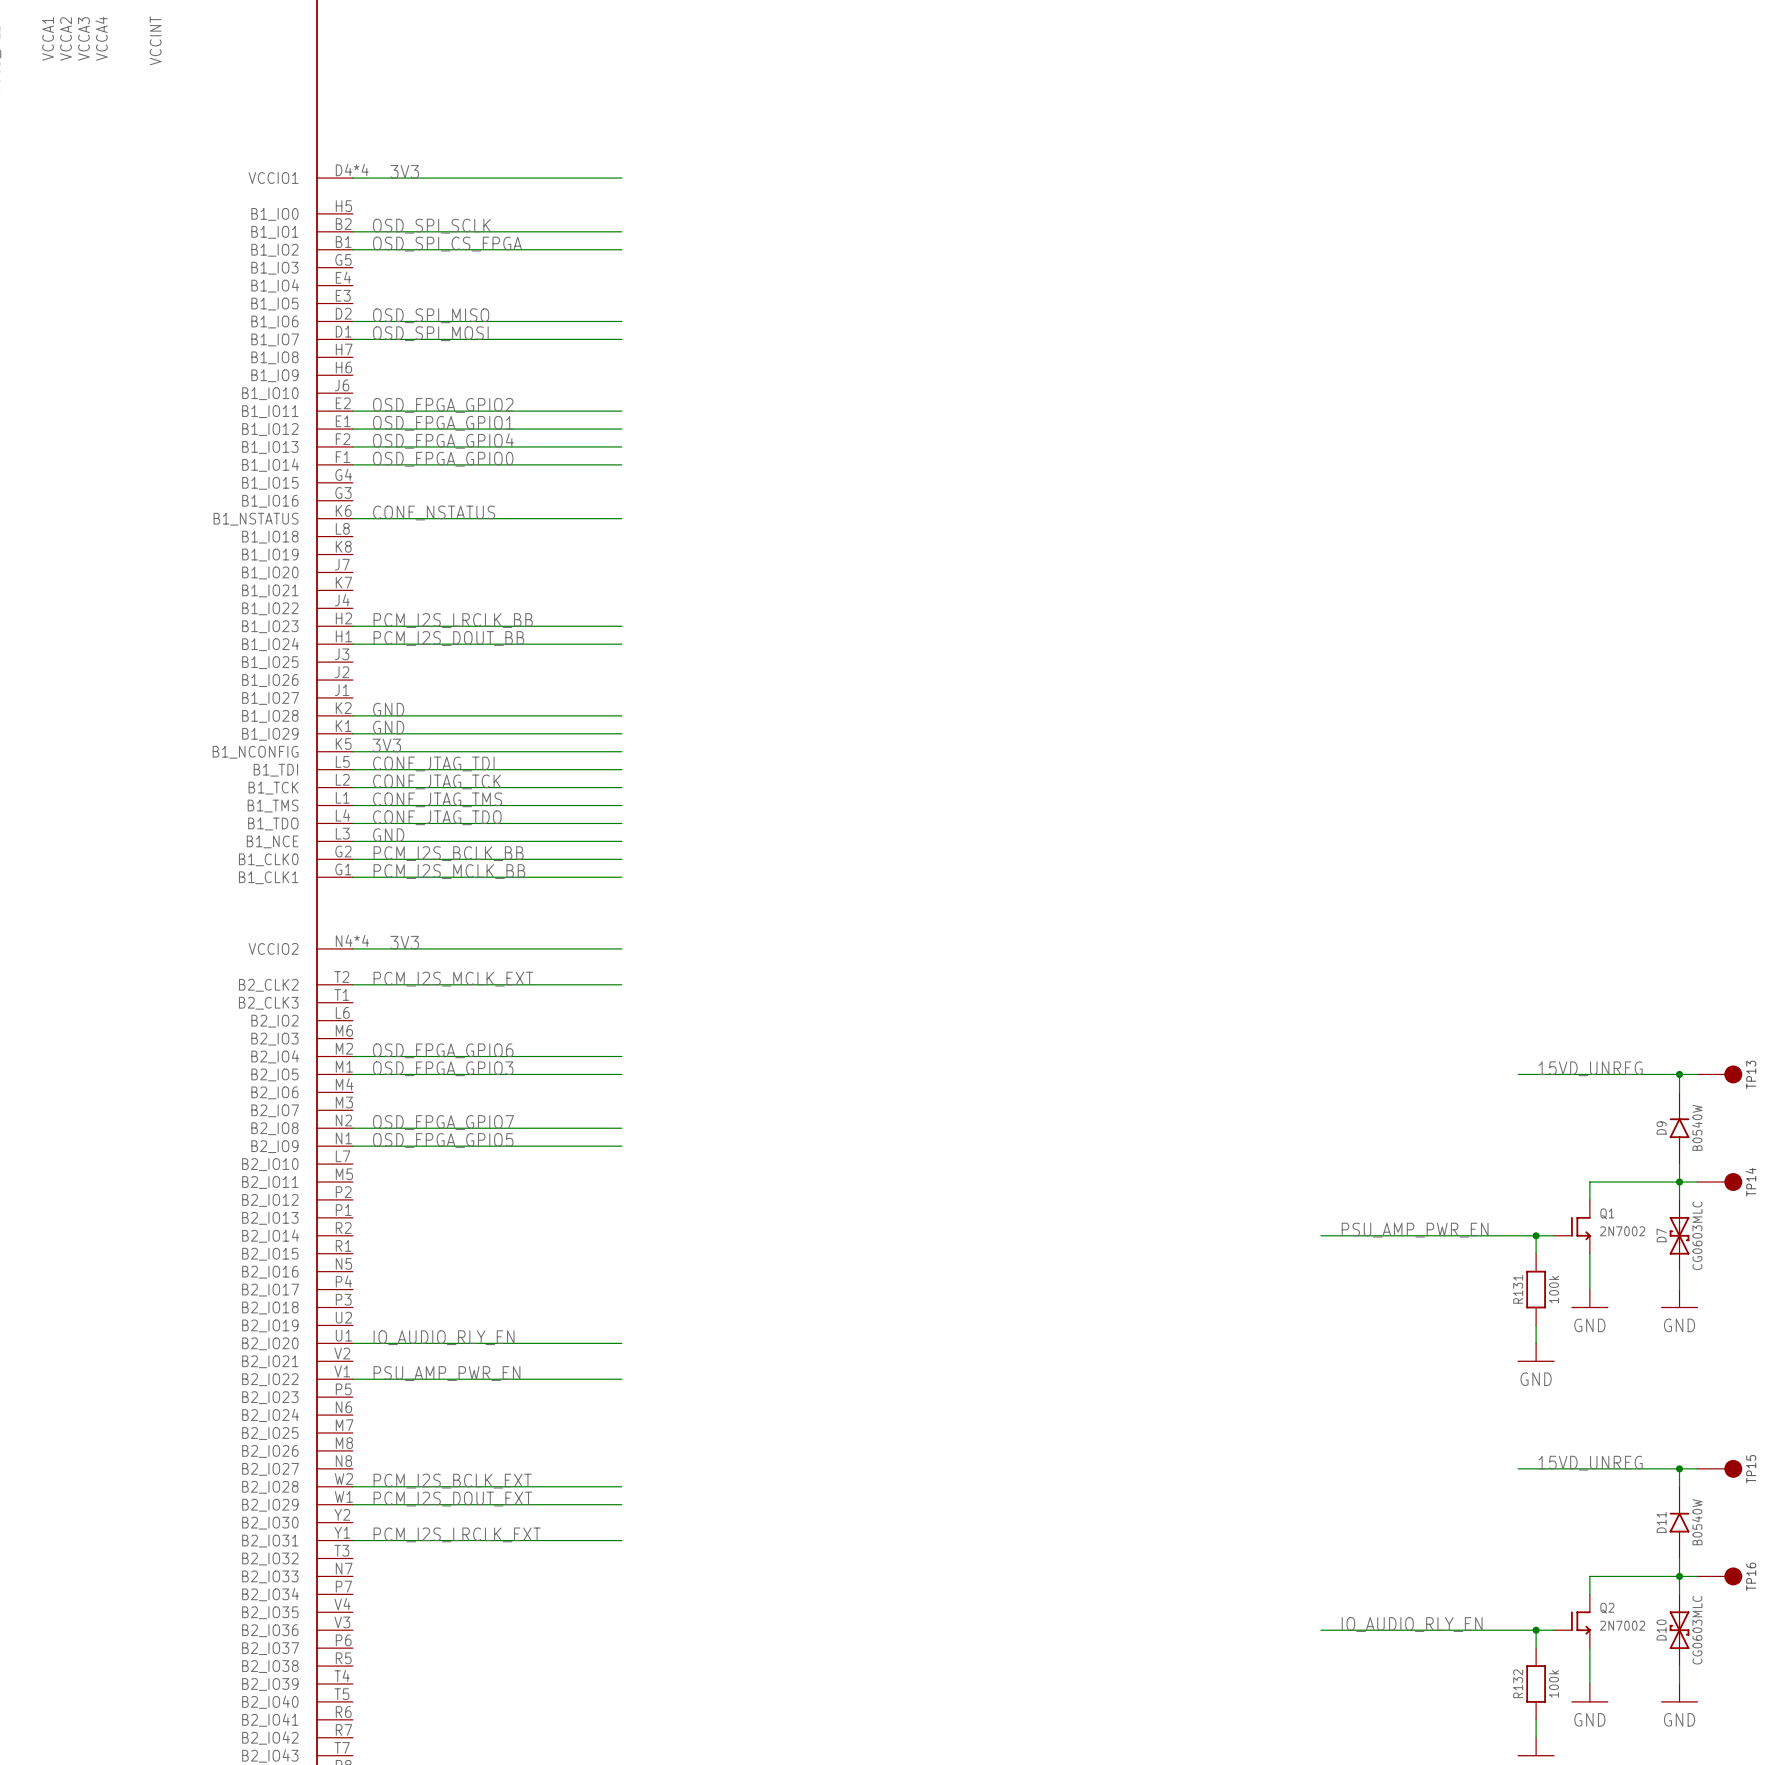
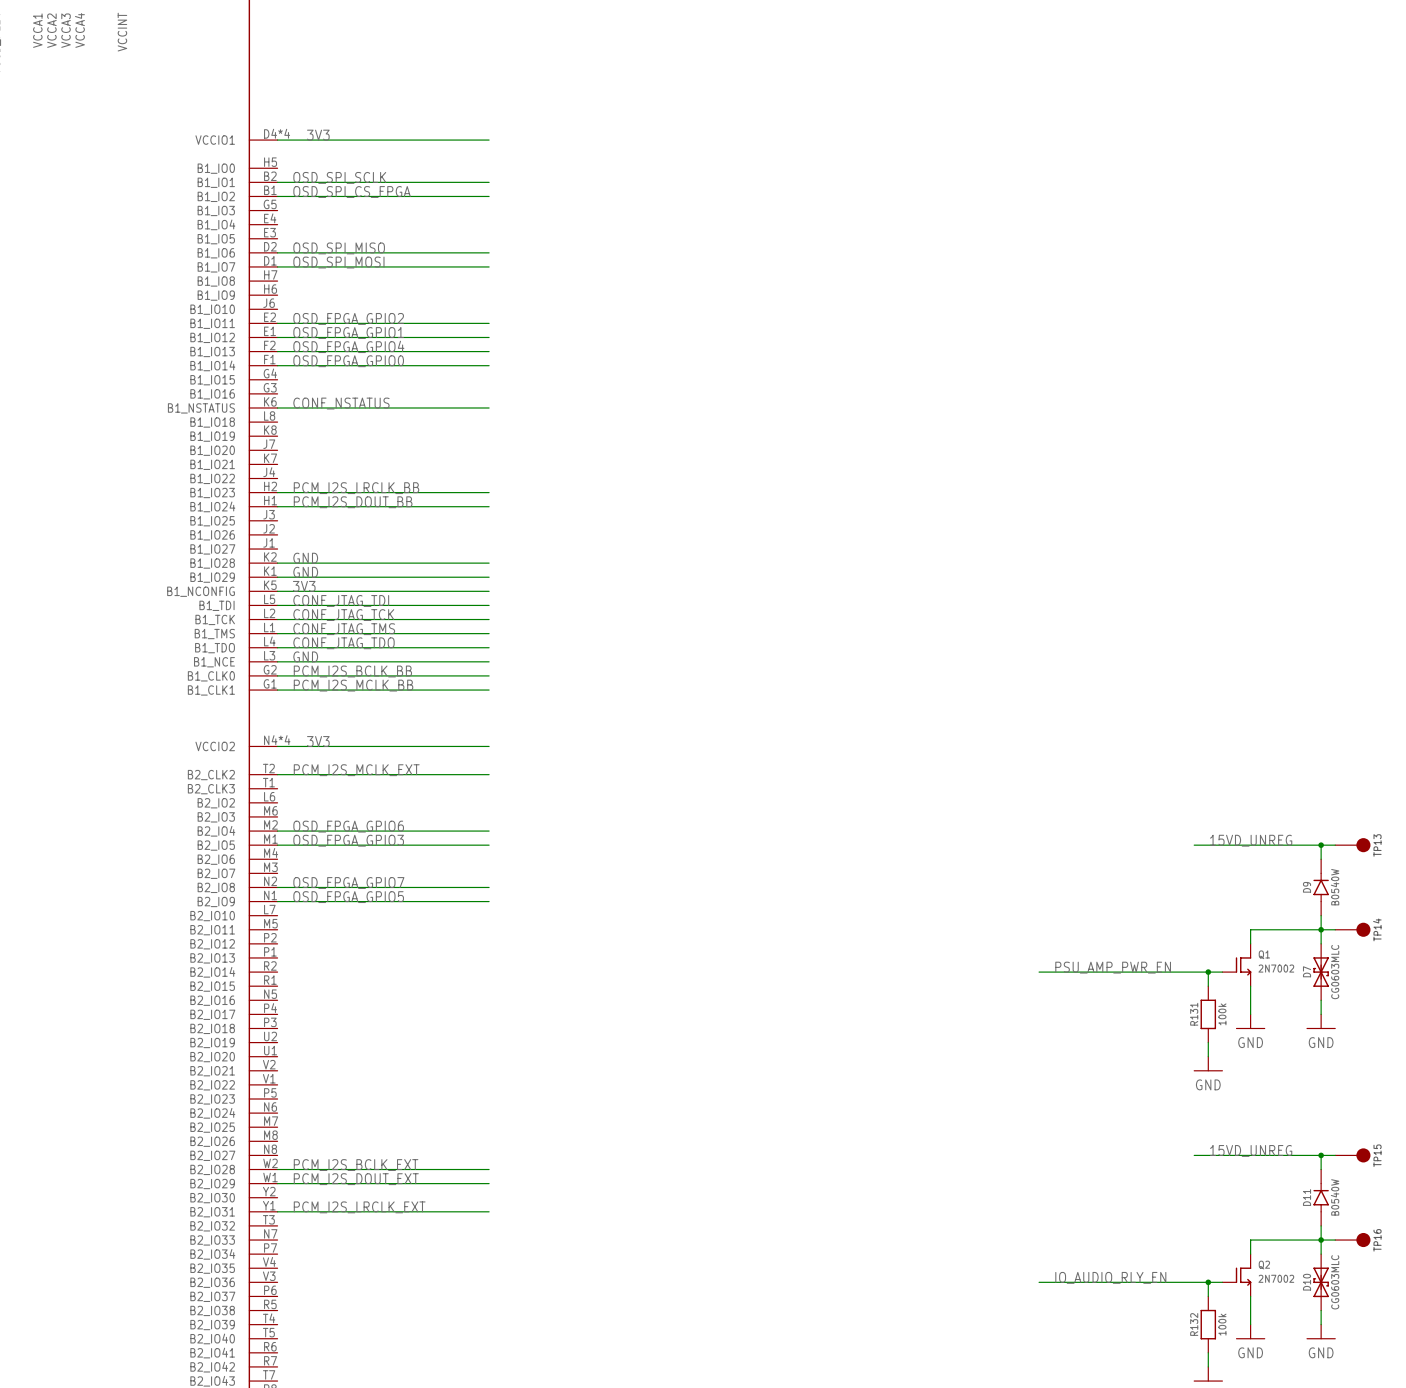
label: IO_AUDIO_RLY_EN (444, 1337) -> none
wire: (352, 1343) (621, 1343) -> none
label: PSU_AMP_PWR_EN (447, 1373) -> none
wire: (352, 1379) (621, 1379) -> none

